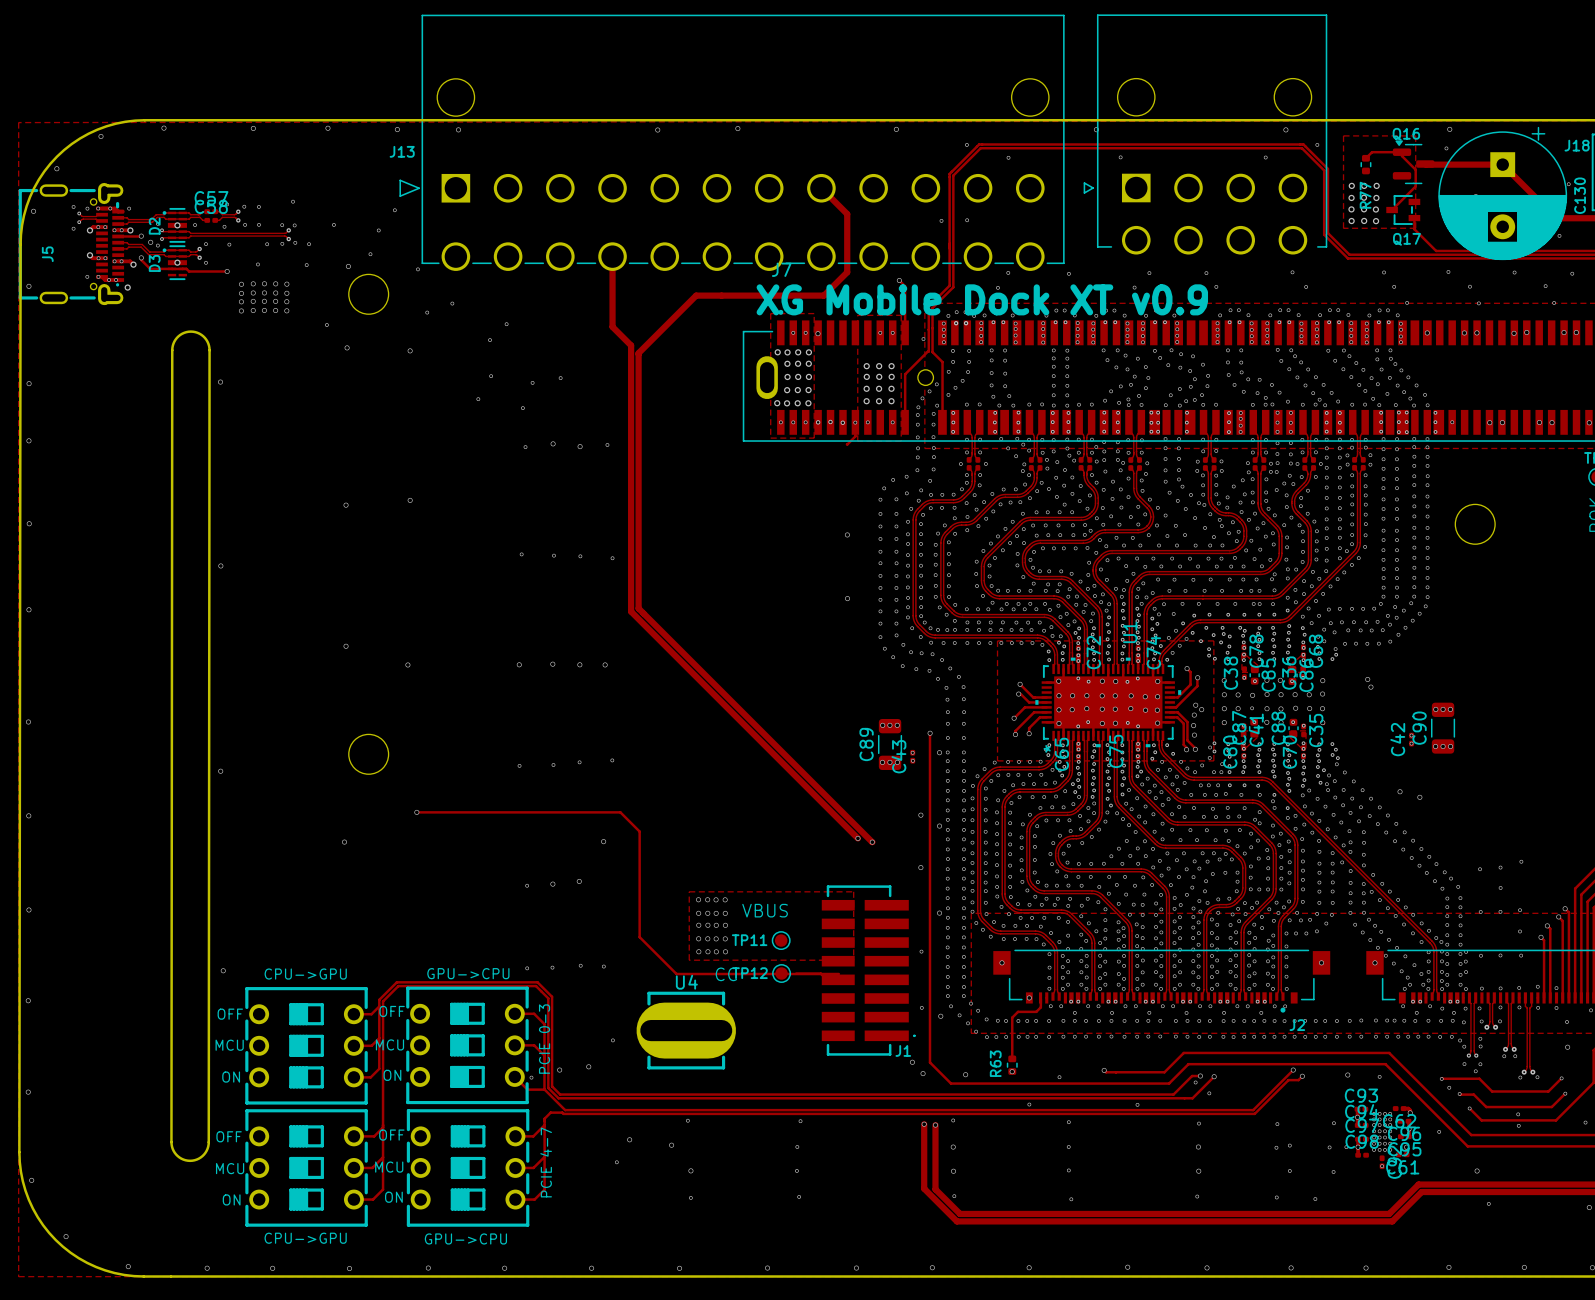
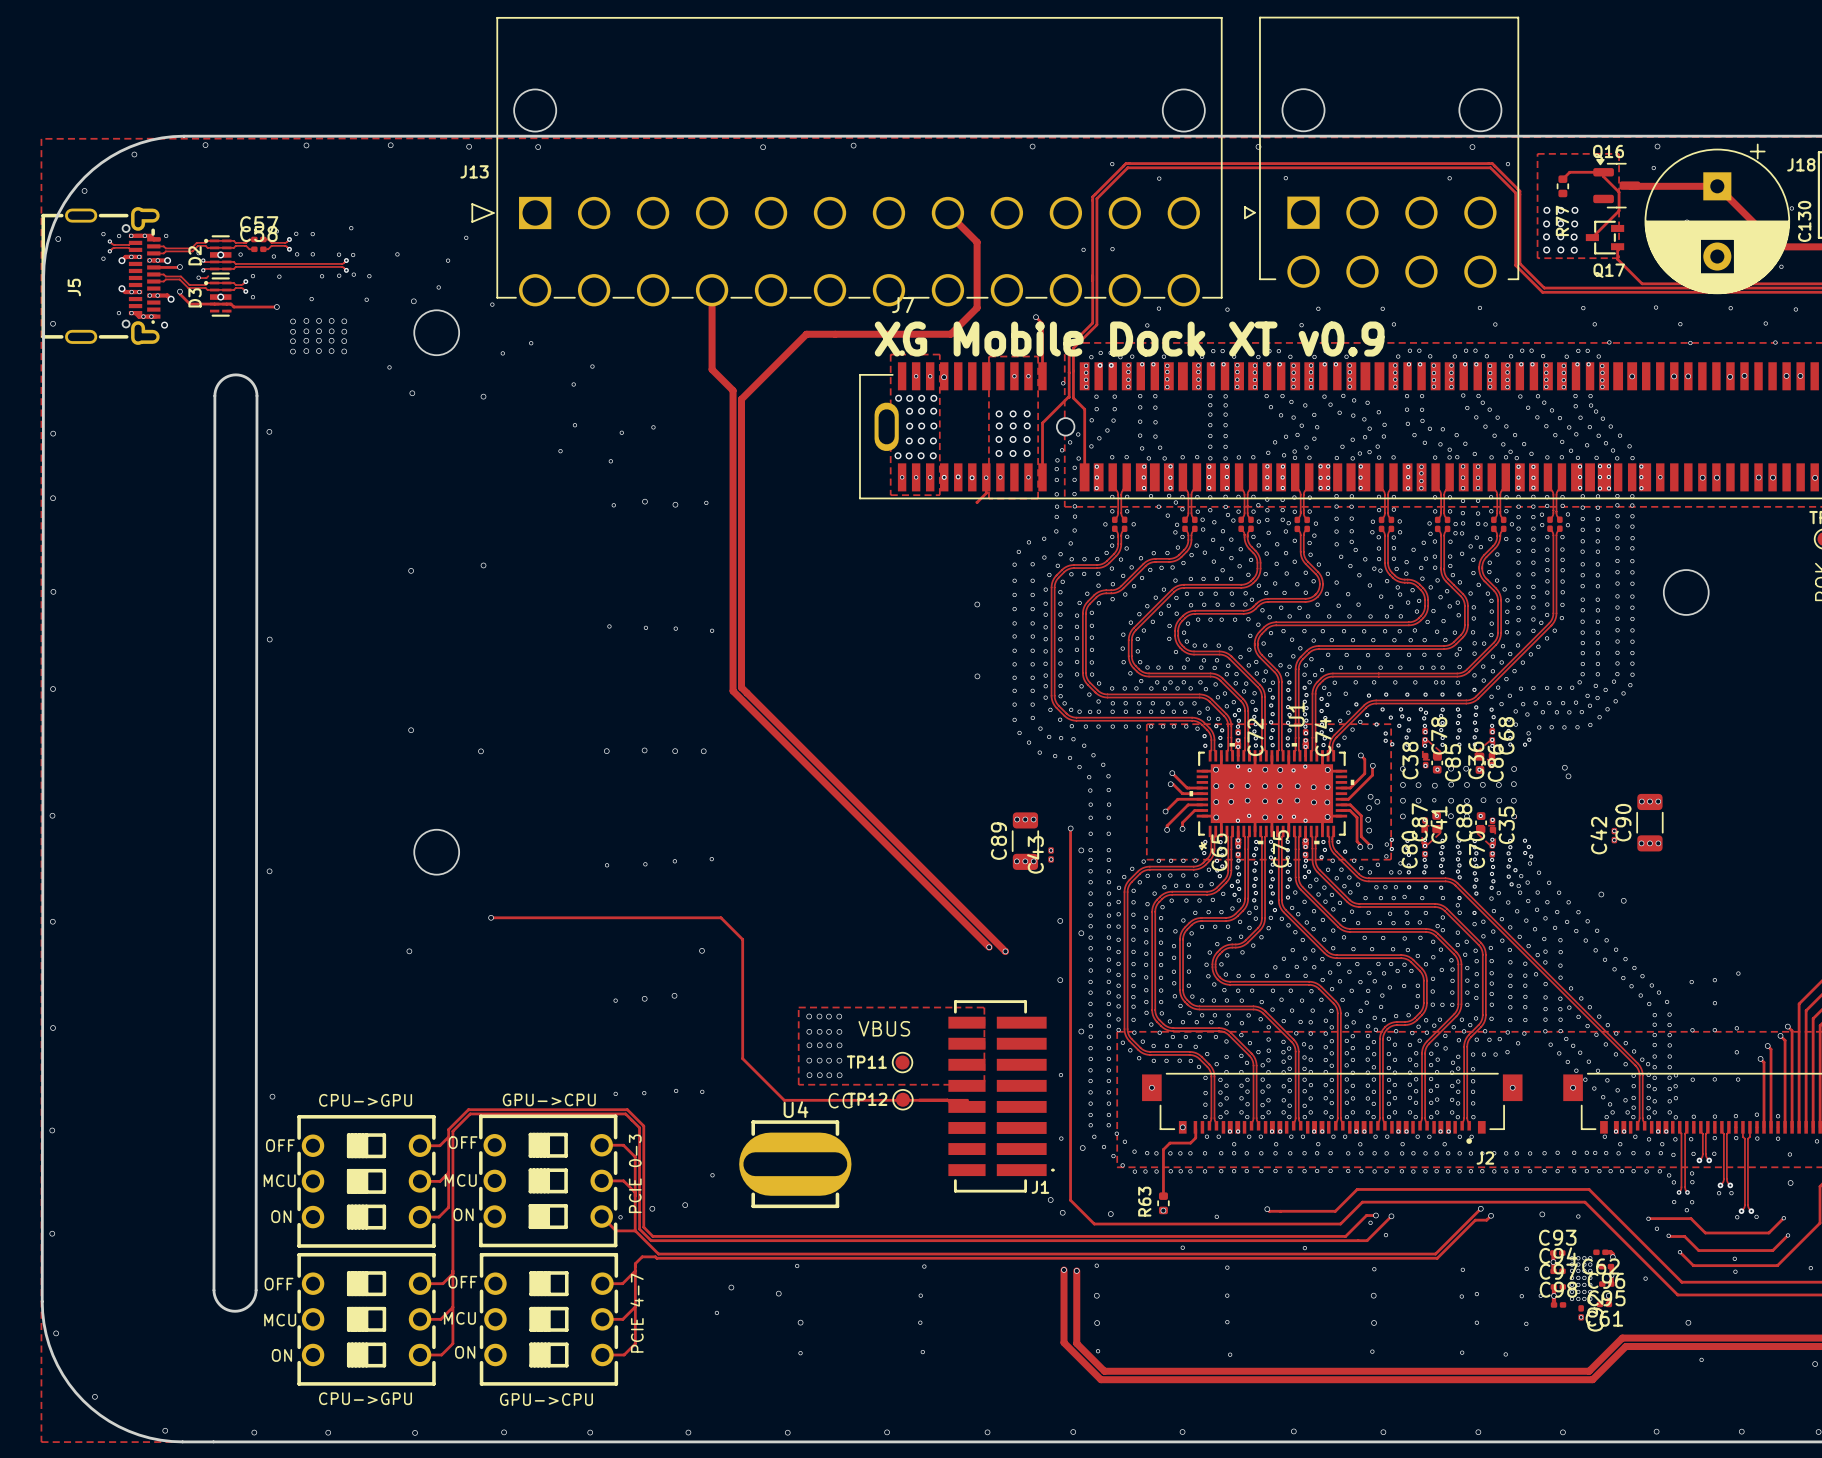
via: (150, 242) -> none
track: none -> (208, 276) (206, 278) (198, 277)

